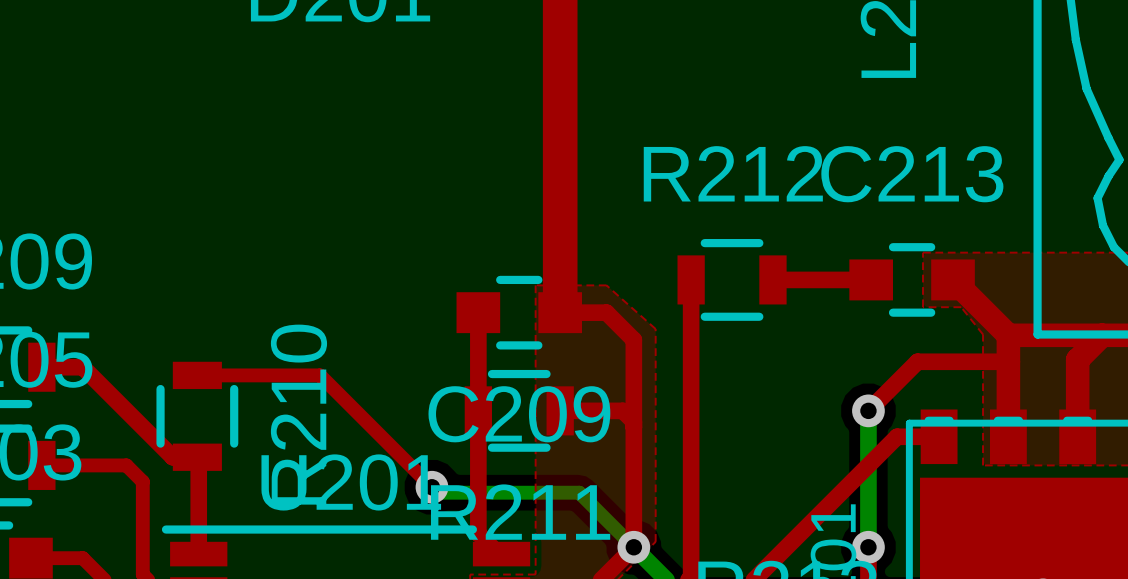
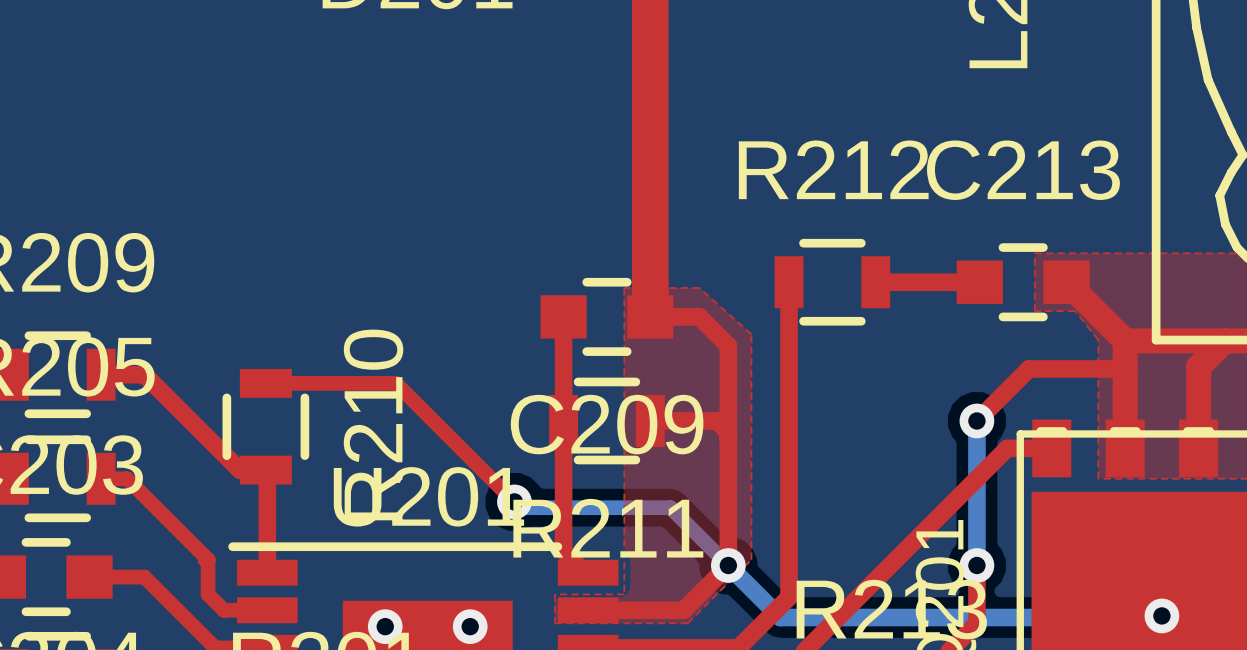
top track: (66, 465) (126, 465) (142, 481) (142, 541) -> (127, 478) (208, 559) (205, 559)

